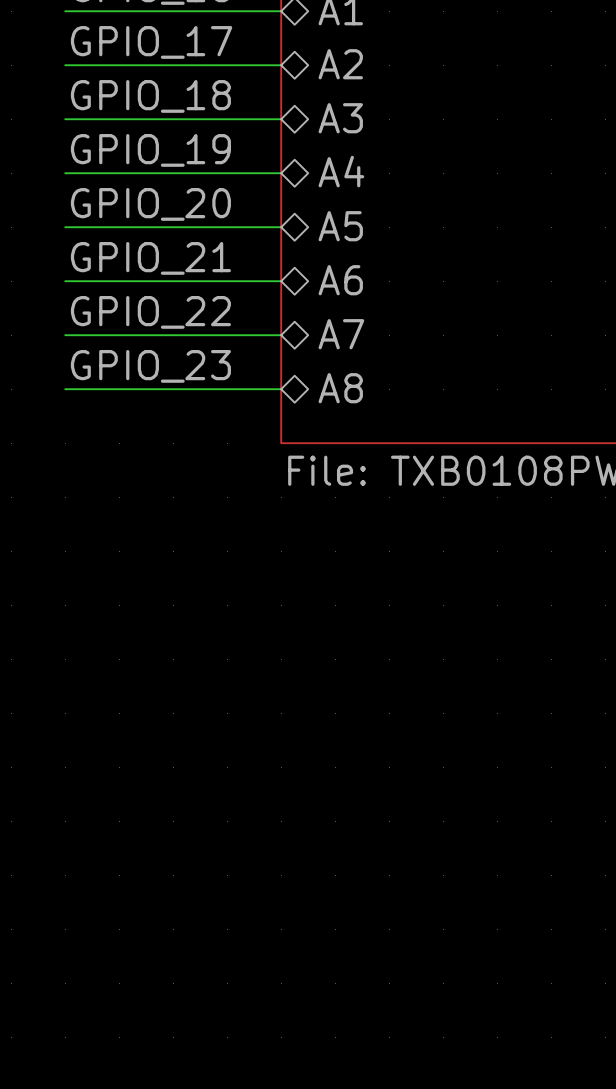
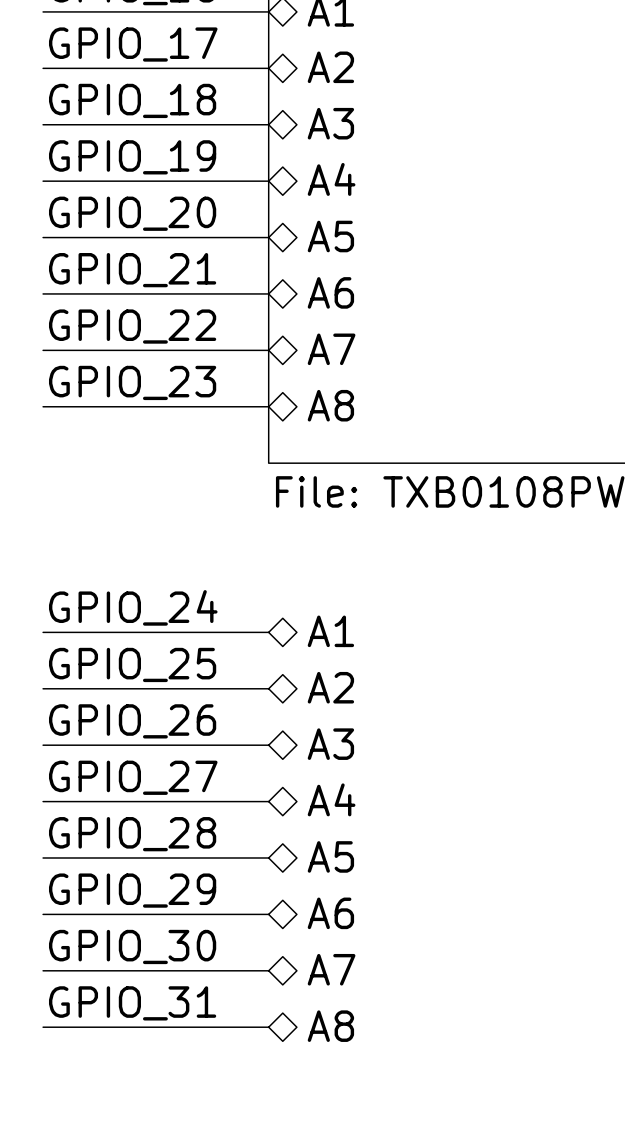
label: none -> GPIO_24 (133, 607)
sheet pin: none -> A1 (330, 631)
wire: none -> (43, 632) (268, 632)
label: none -> GPIO_25 (132, 664)
sheet pin: none -> A2 (330, 687)
wire: none -> (43, 688) (268, 688)
label: none -> GPIO_26 (132, 721)
sheet pin: none -> A3 (330, 744)
wire: none -> (43, 745) (268, 745)
label: none -> GPIO_27 (133, 777)
sheet pin: none -> A4 (331, 799)
wire: none -> (43, 801) (268, 801)
label: none -> GPIO_28 (132, 834)
sheet pin: none -> A5 (330, 856)
wire: none -> (43, 857) (268, 857)
label: none -> GPIO_29 (132, 890)
sheet pin: none -> A6 (330, 913)
wire: none -> (43, 914) (268, 914)
label: none -> GPIO_30 (132, 946)
sheet pin: none -> A7 (331, 969)
wire: none -> (43, 970) (268, 970)
label: none -> GPIO_31 (132, 1003)
sheet pin: none -> A8 (330, 1026)
wire: none -> (43, 1027) (268, 1027)

